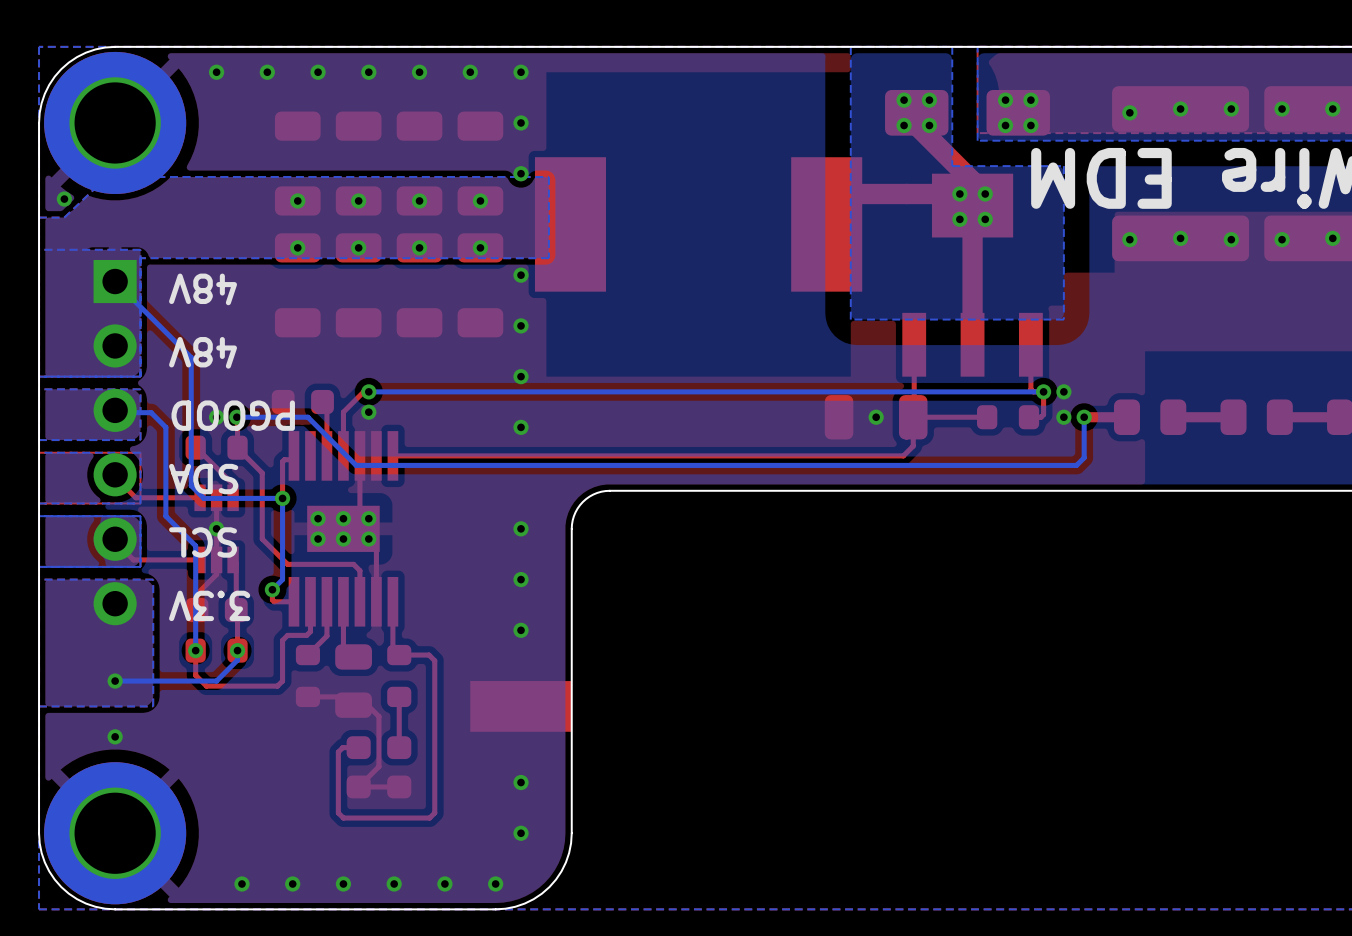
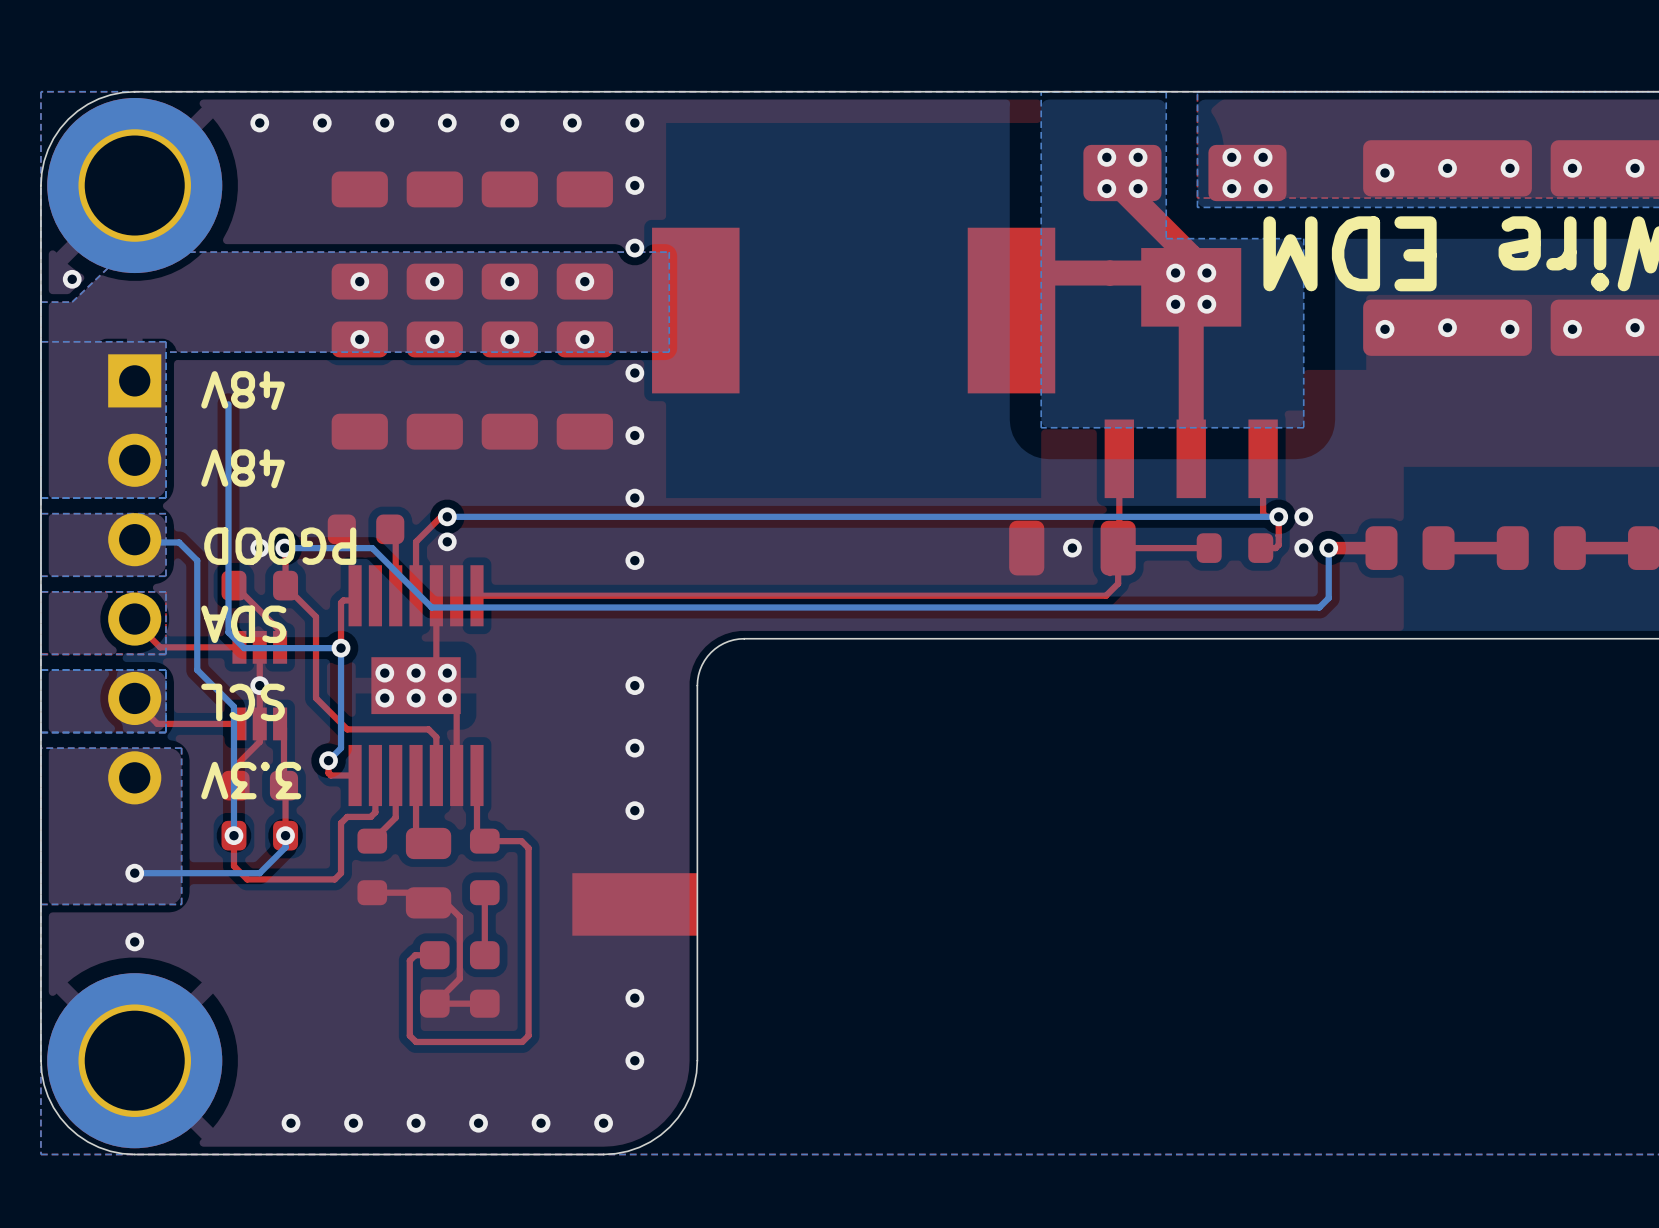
bottom track: (115, 281) (191, 357) -> (228, 404) (228, 474)

